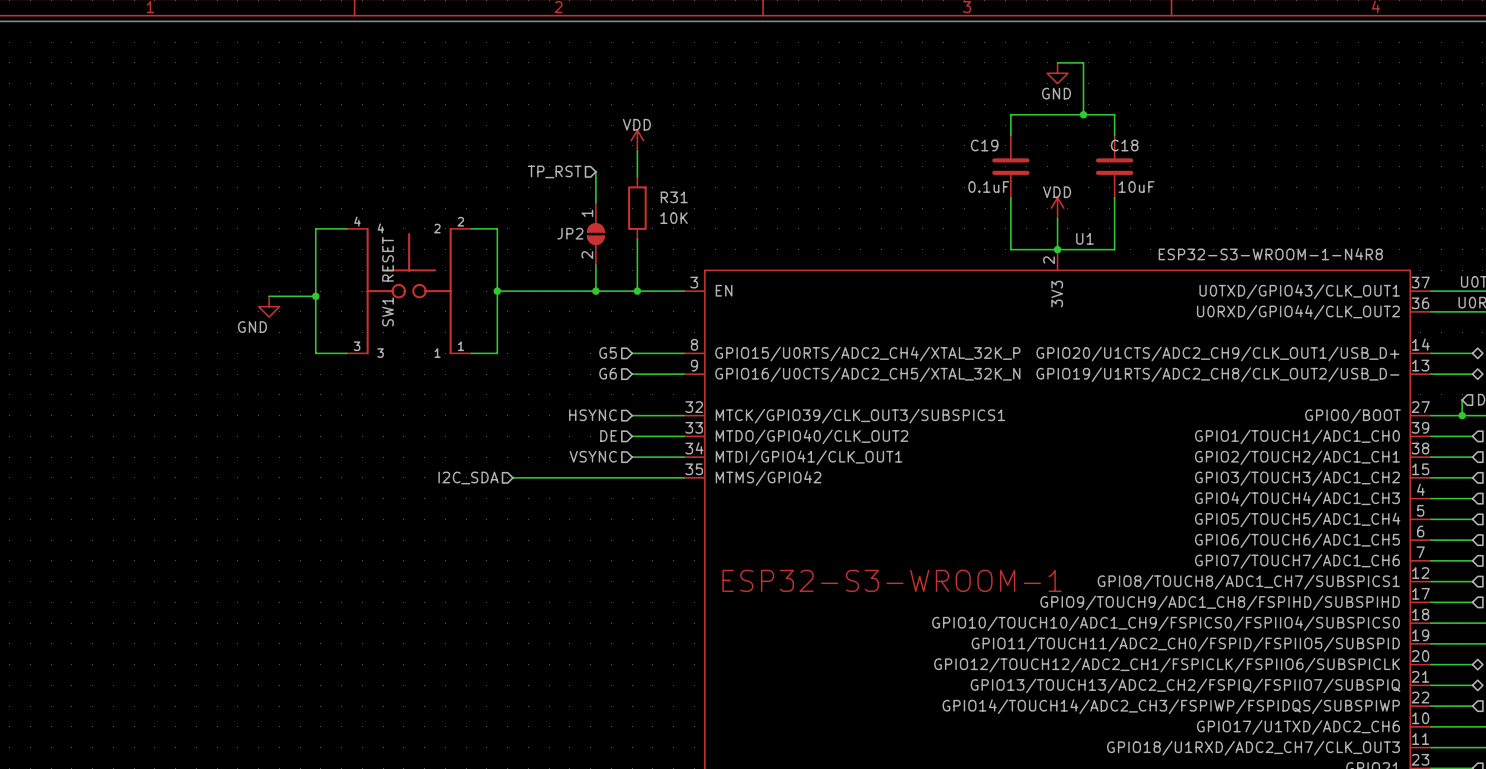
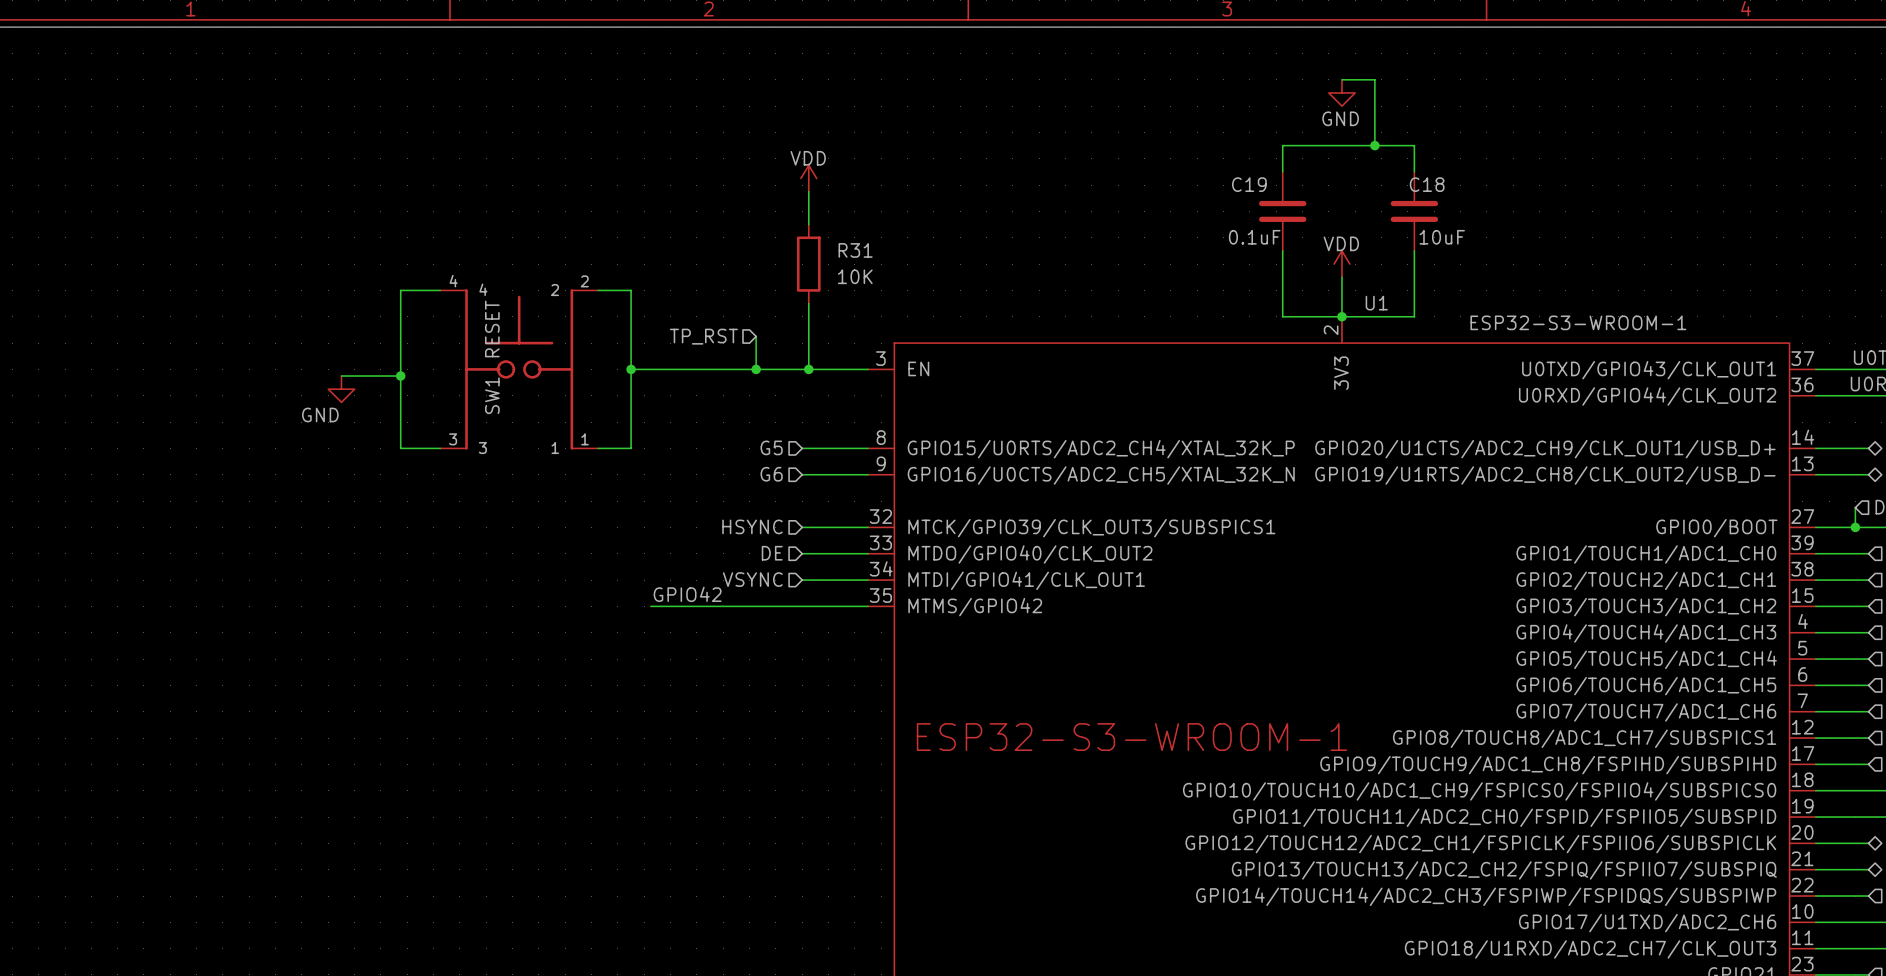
hierarchical label position: TP_RST (554, 171) -> TP_RST (703, 336)
wire: (595, 171) (595, 202) -> none
JP2: (595, 234) -> none
U1 value: ESP32-S3-WROOM-1-N4R8 (1270, 254) -> ESP32-S3-WROOM-1 (1578, 322)
label: none -> GPIO42 (687, 594)
hierarchical label: I2C_SDA (468, 477) -> none

